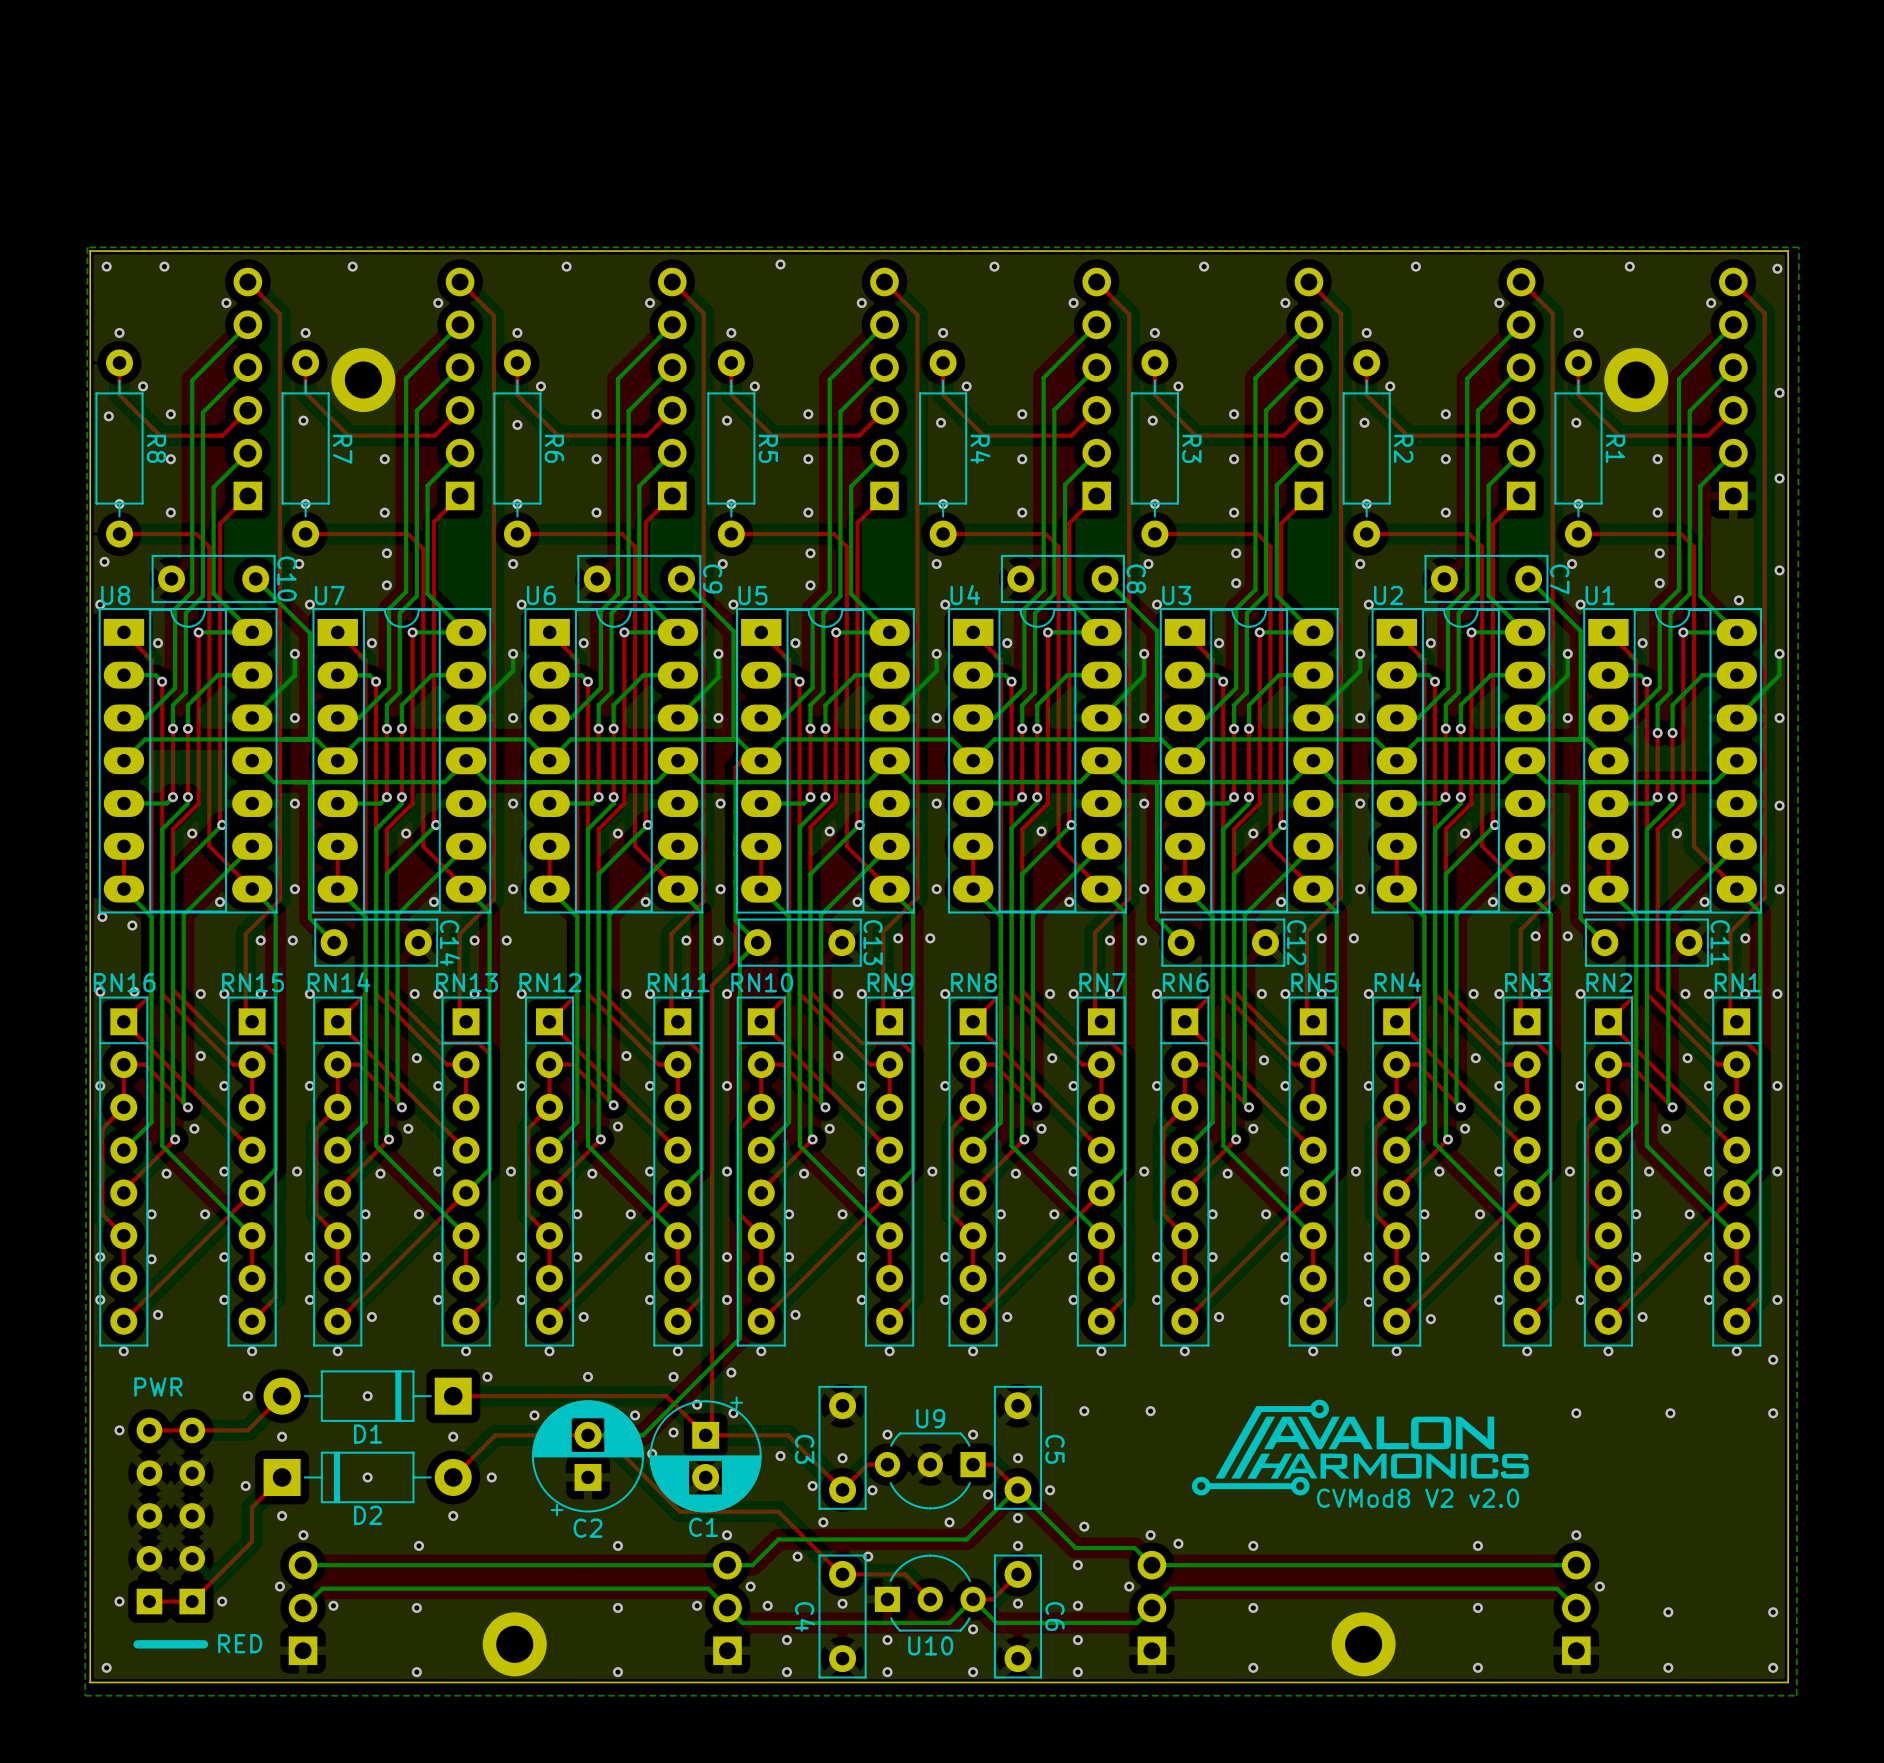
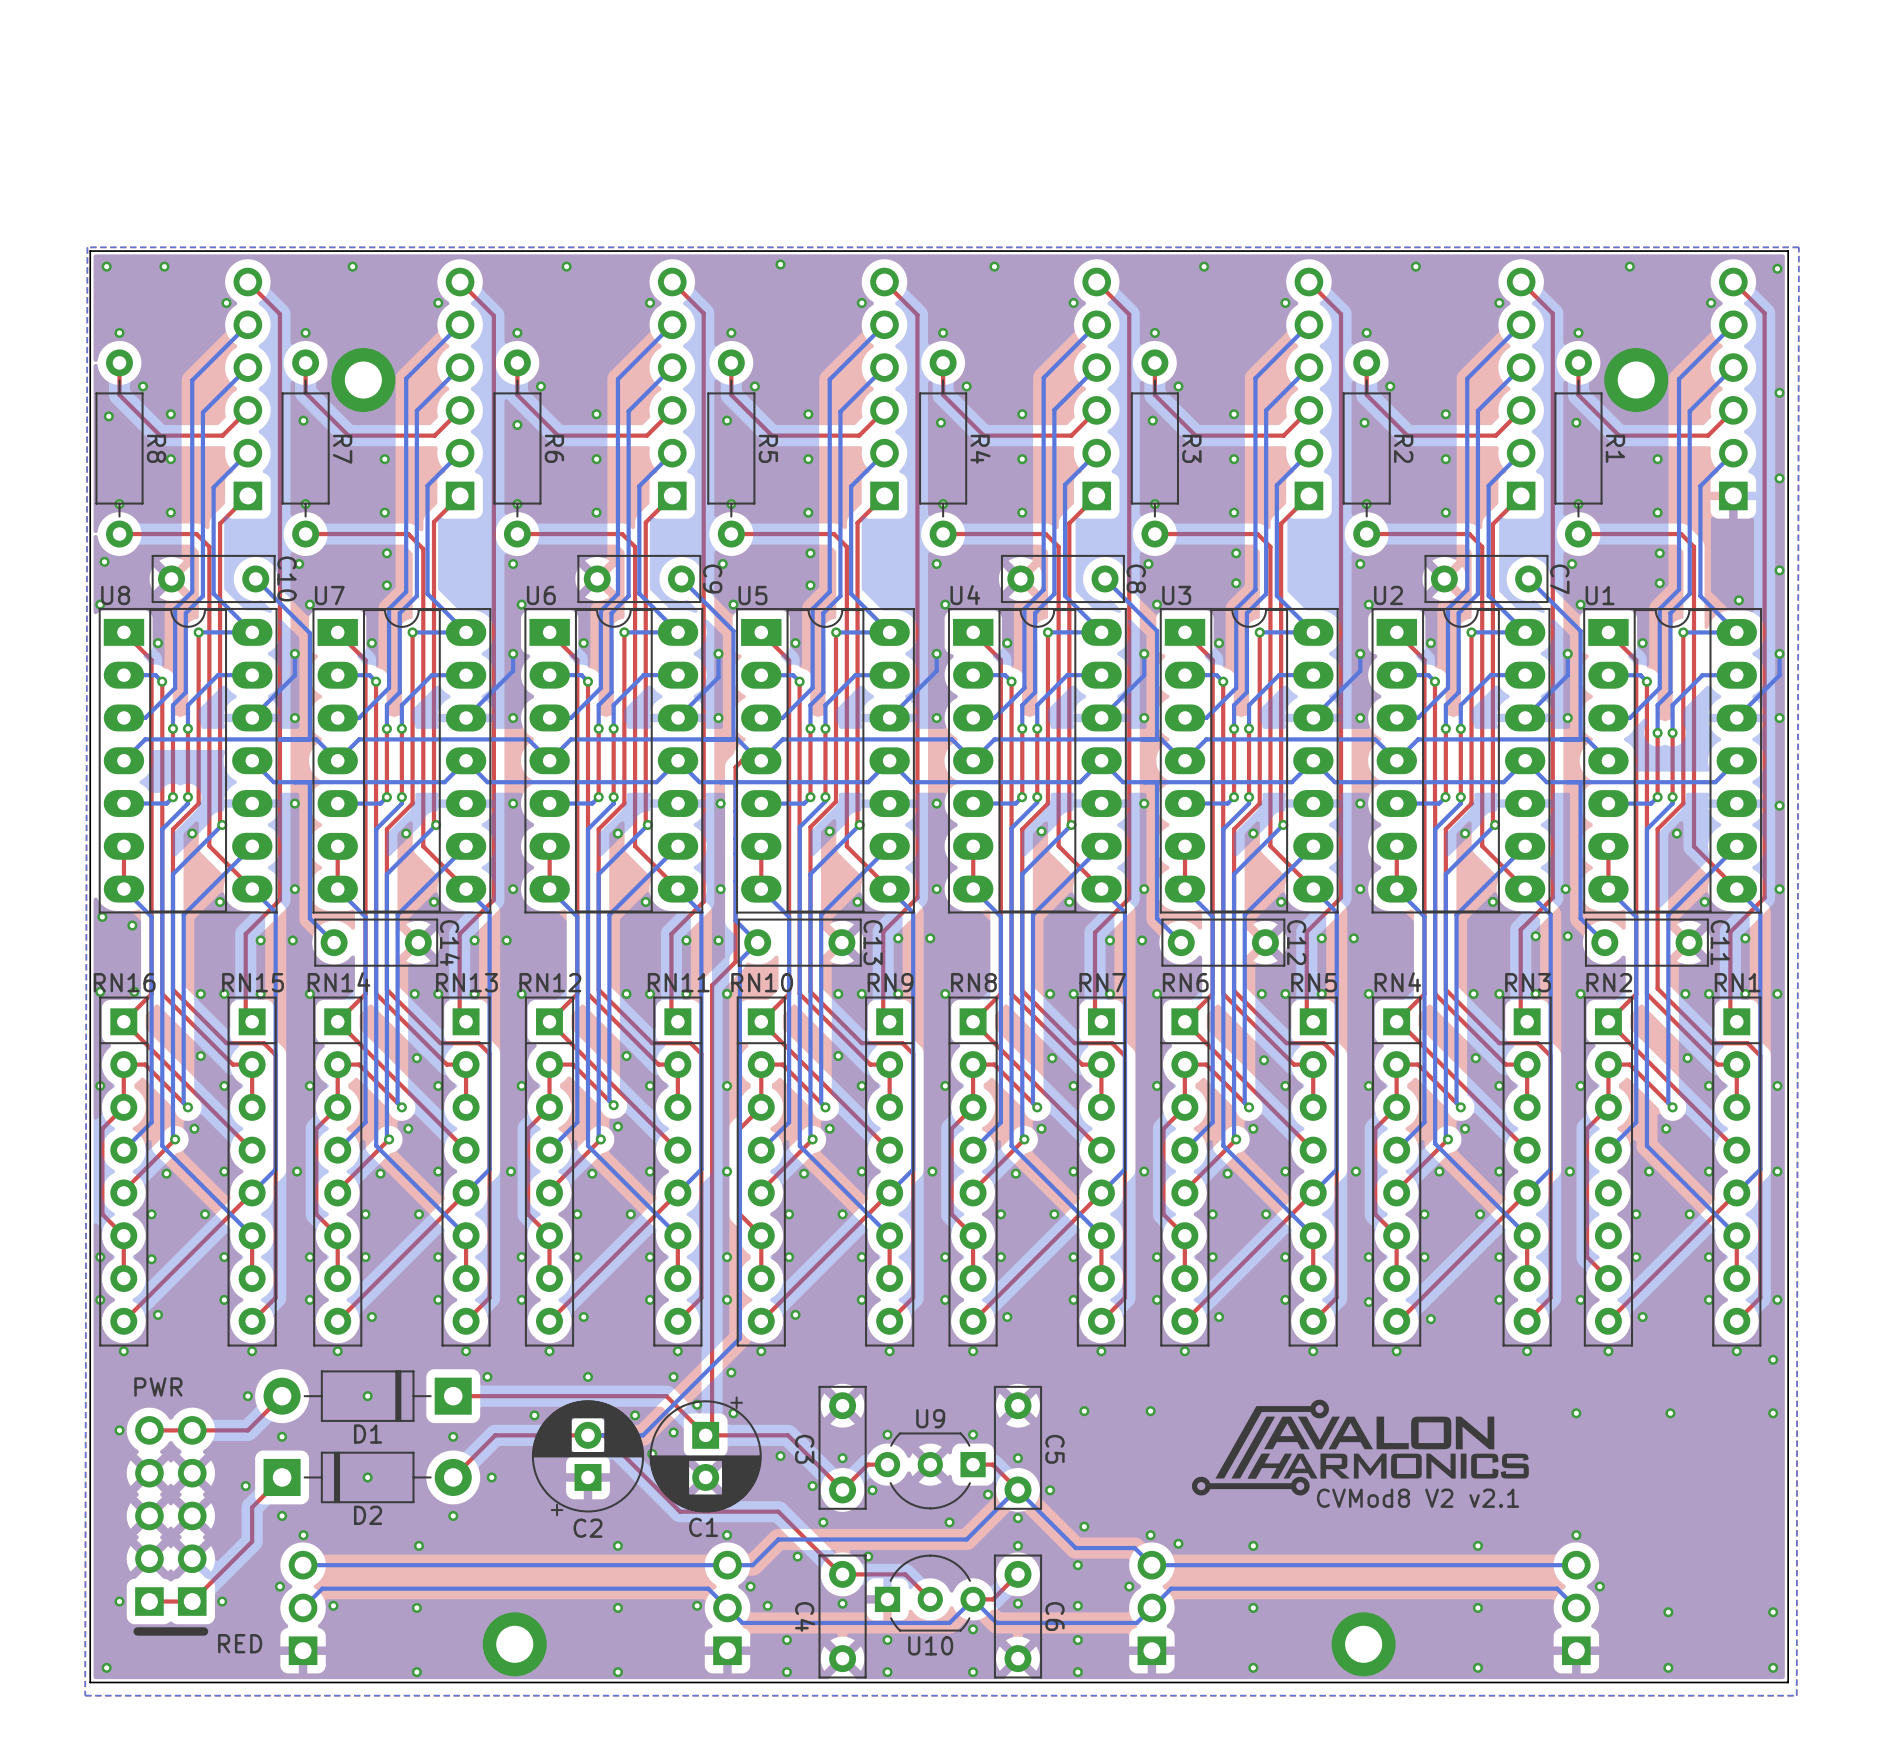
part footprint: [133, 1417, 209, 1649] -> [133, 1416, 209, 1636]
text: CVMod8 V2 v2.0 (1418, 1498) -> CVMod8 V2 v2.1 (1418, 1498)

